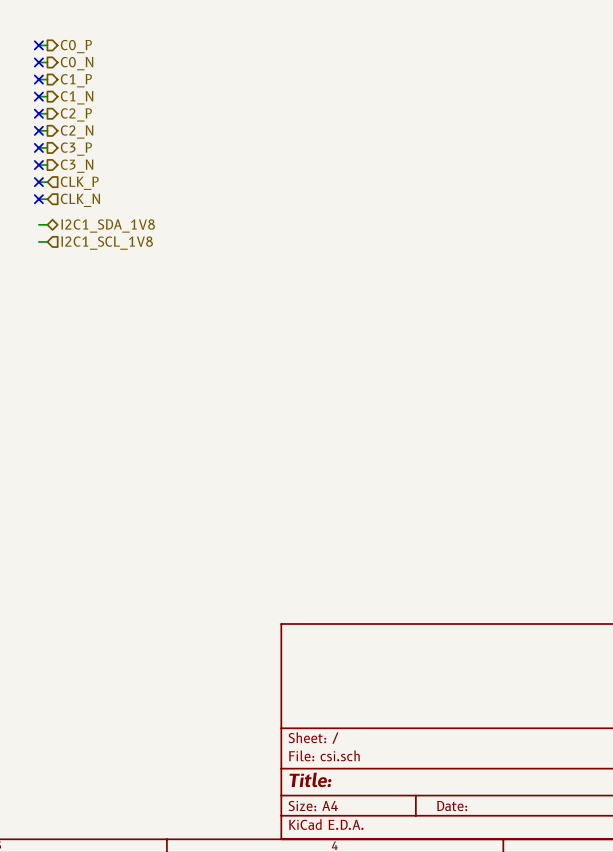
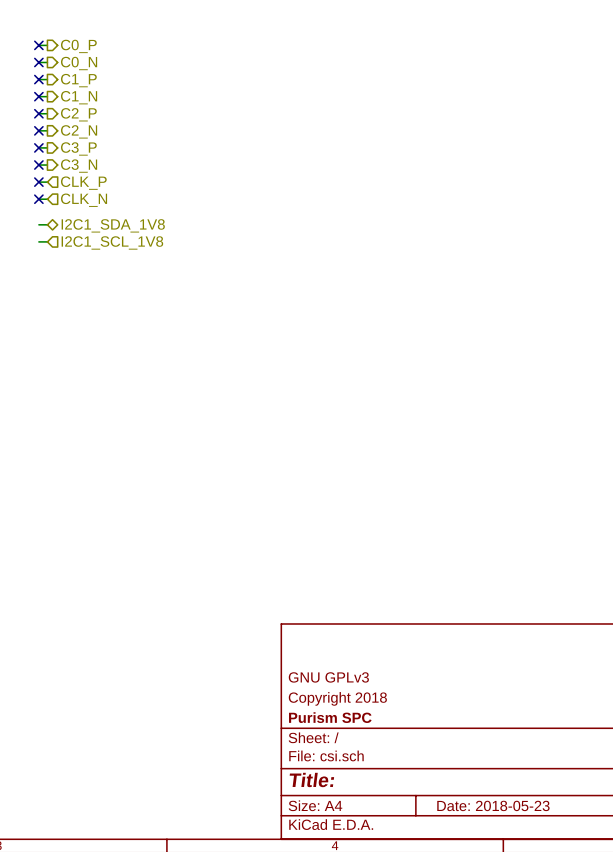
title block: none -> GNU GPLv3 (328, 677)
title block: none -> Copyright 2018 (337, 698)
title block: none -> Purism SPC (330, 717)
title block: Date: (452, 806) -> Date: 2018-05-23 (493, 805)

